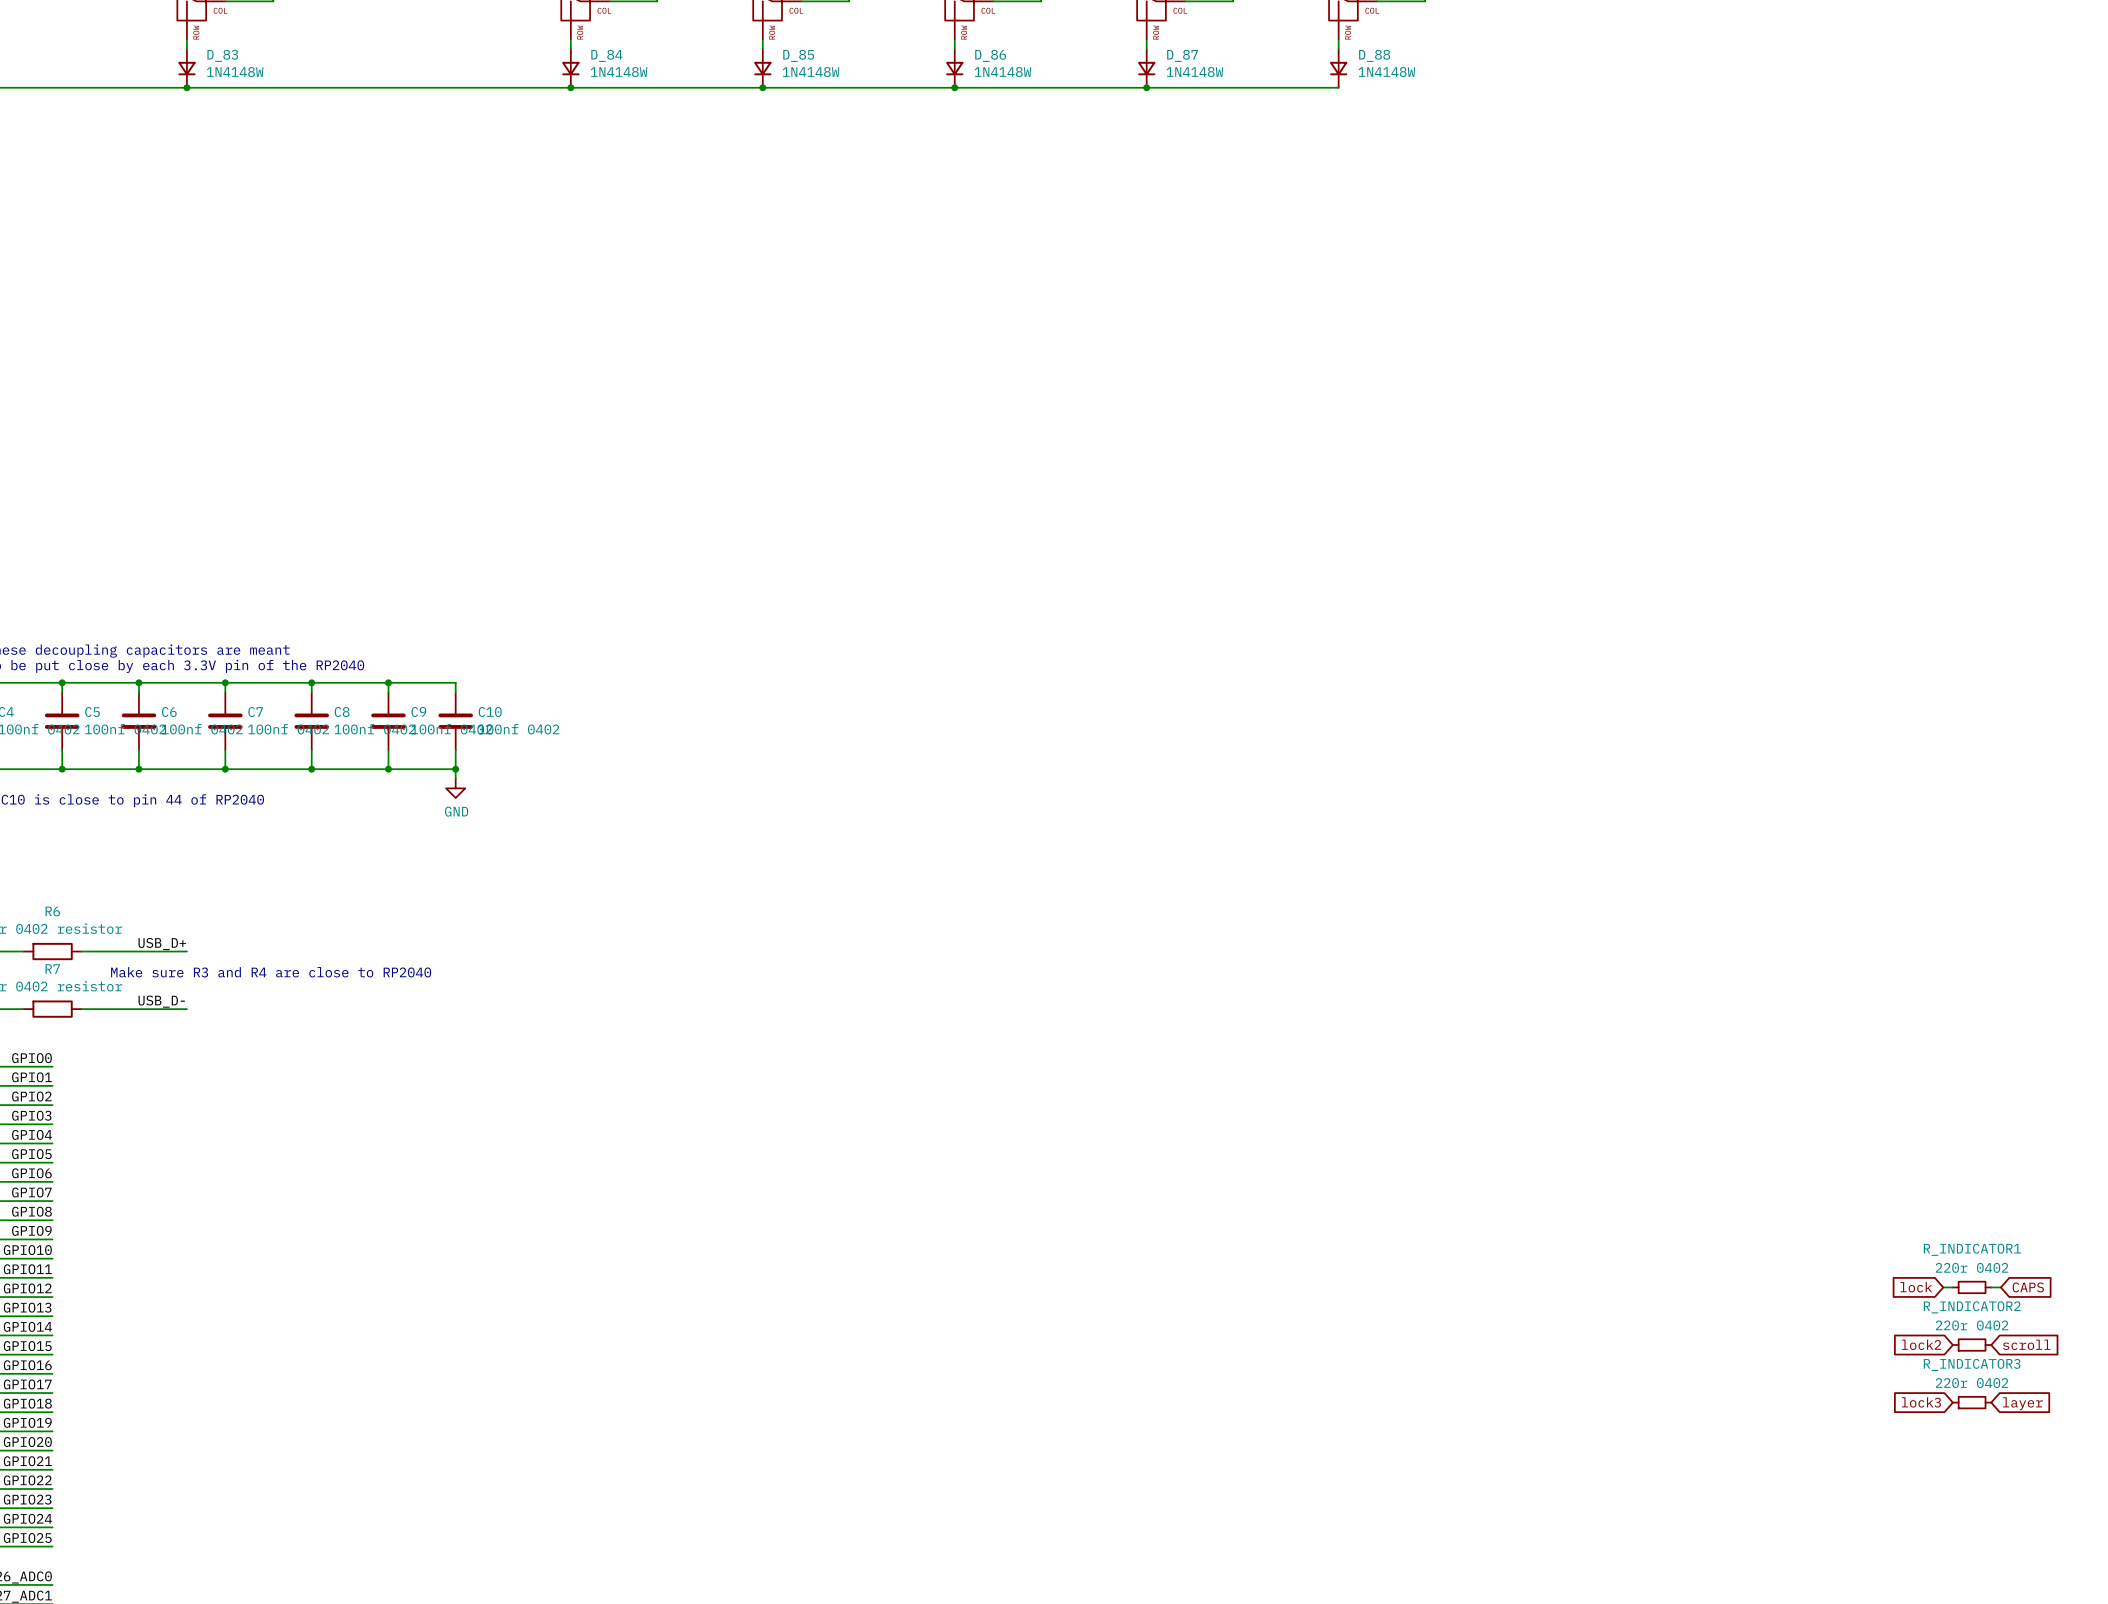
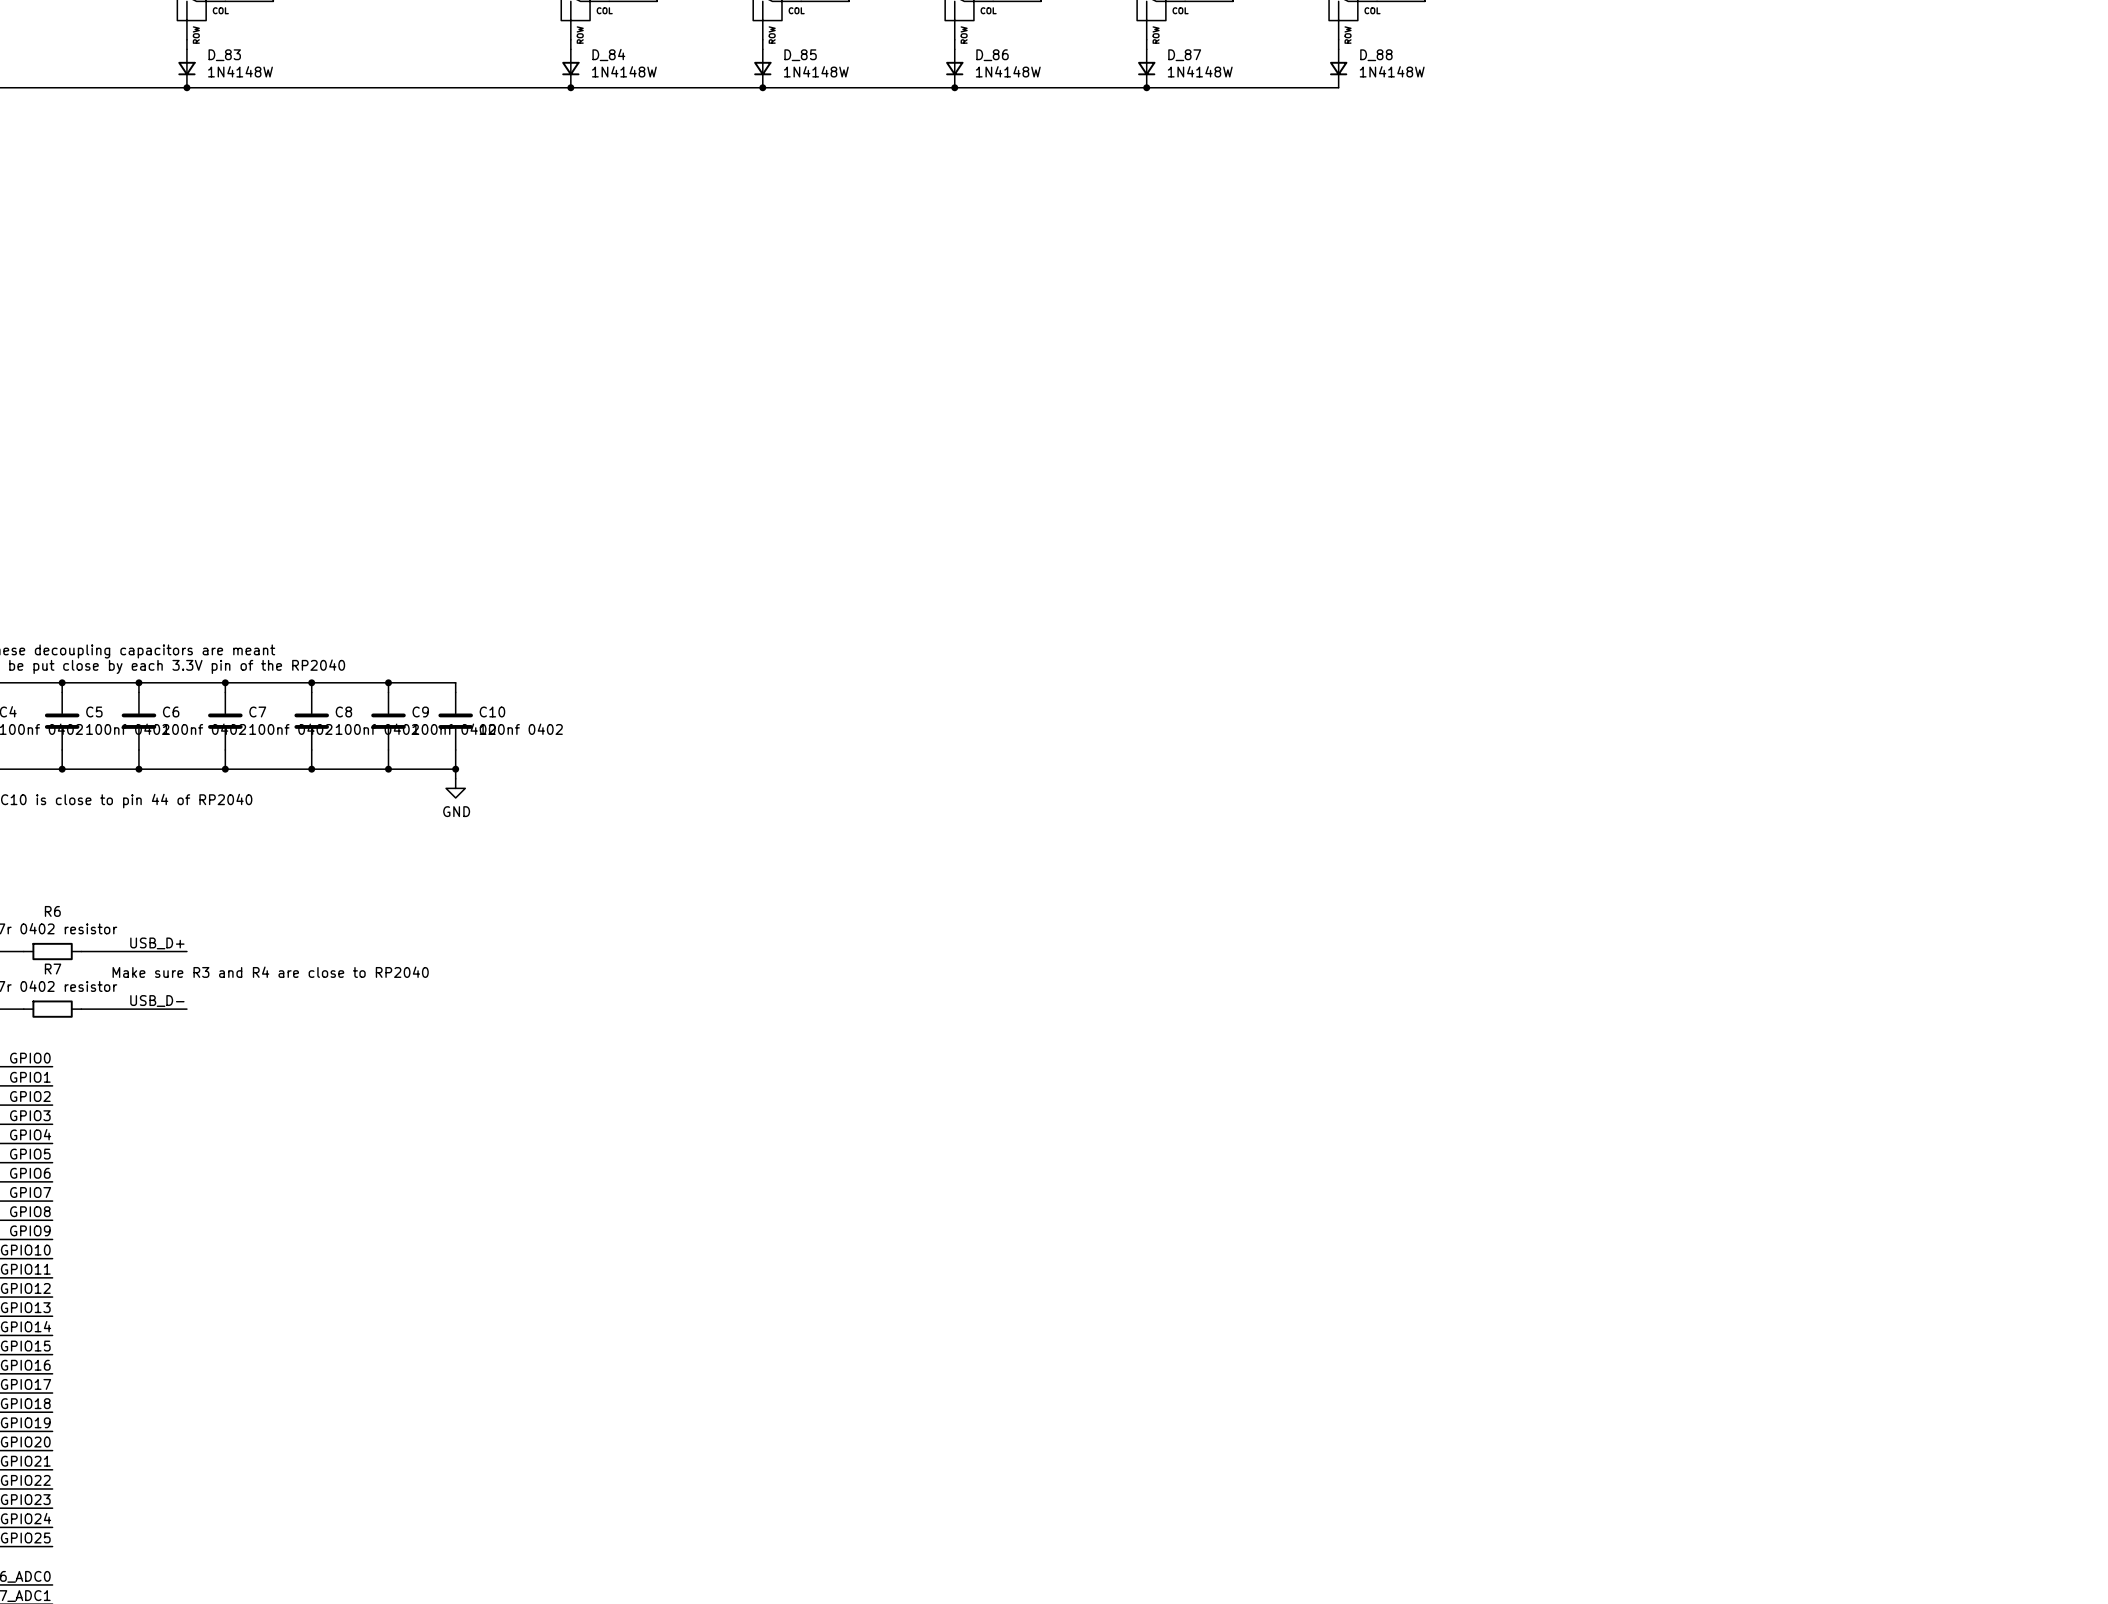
global label: lock (1916, 1287) -> none
wire: (1943, 1287) (1952, 1287) -> none
R_INDICATOR1: 220r 0402 (1972, 1287) -> none
wire: (1991, 1287) (2000, 1287) -> none
global label: CAPS (2028, 1287) -> none
global label: lock2 (1921, 1344) -> none
global label: scroll (2026, 1344) -> none
R_INDICATOR2: 220r 0402 (1972, 1345) -> none
global label: lock3 (1921, 1402) -> none
R_INDICATOR3: 220r 0402 (1972, 1402) -> none
global label: layer (2022, 1403) -> none

